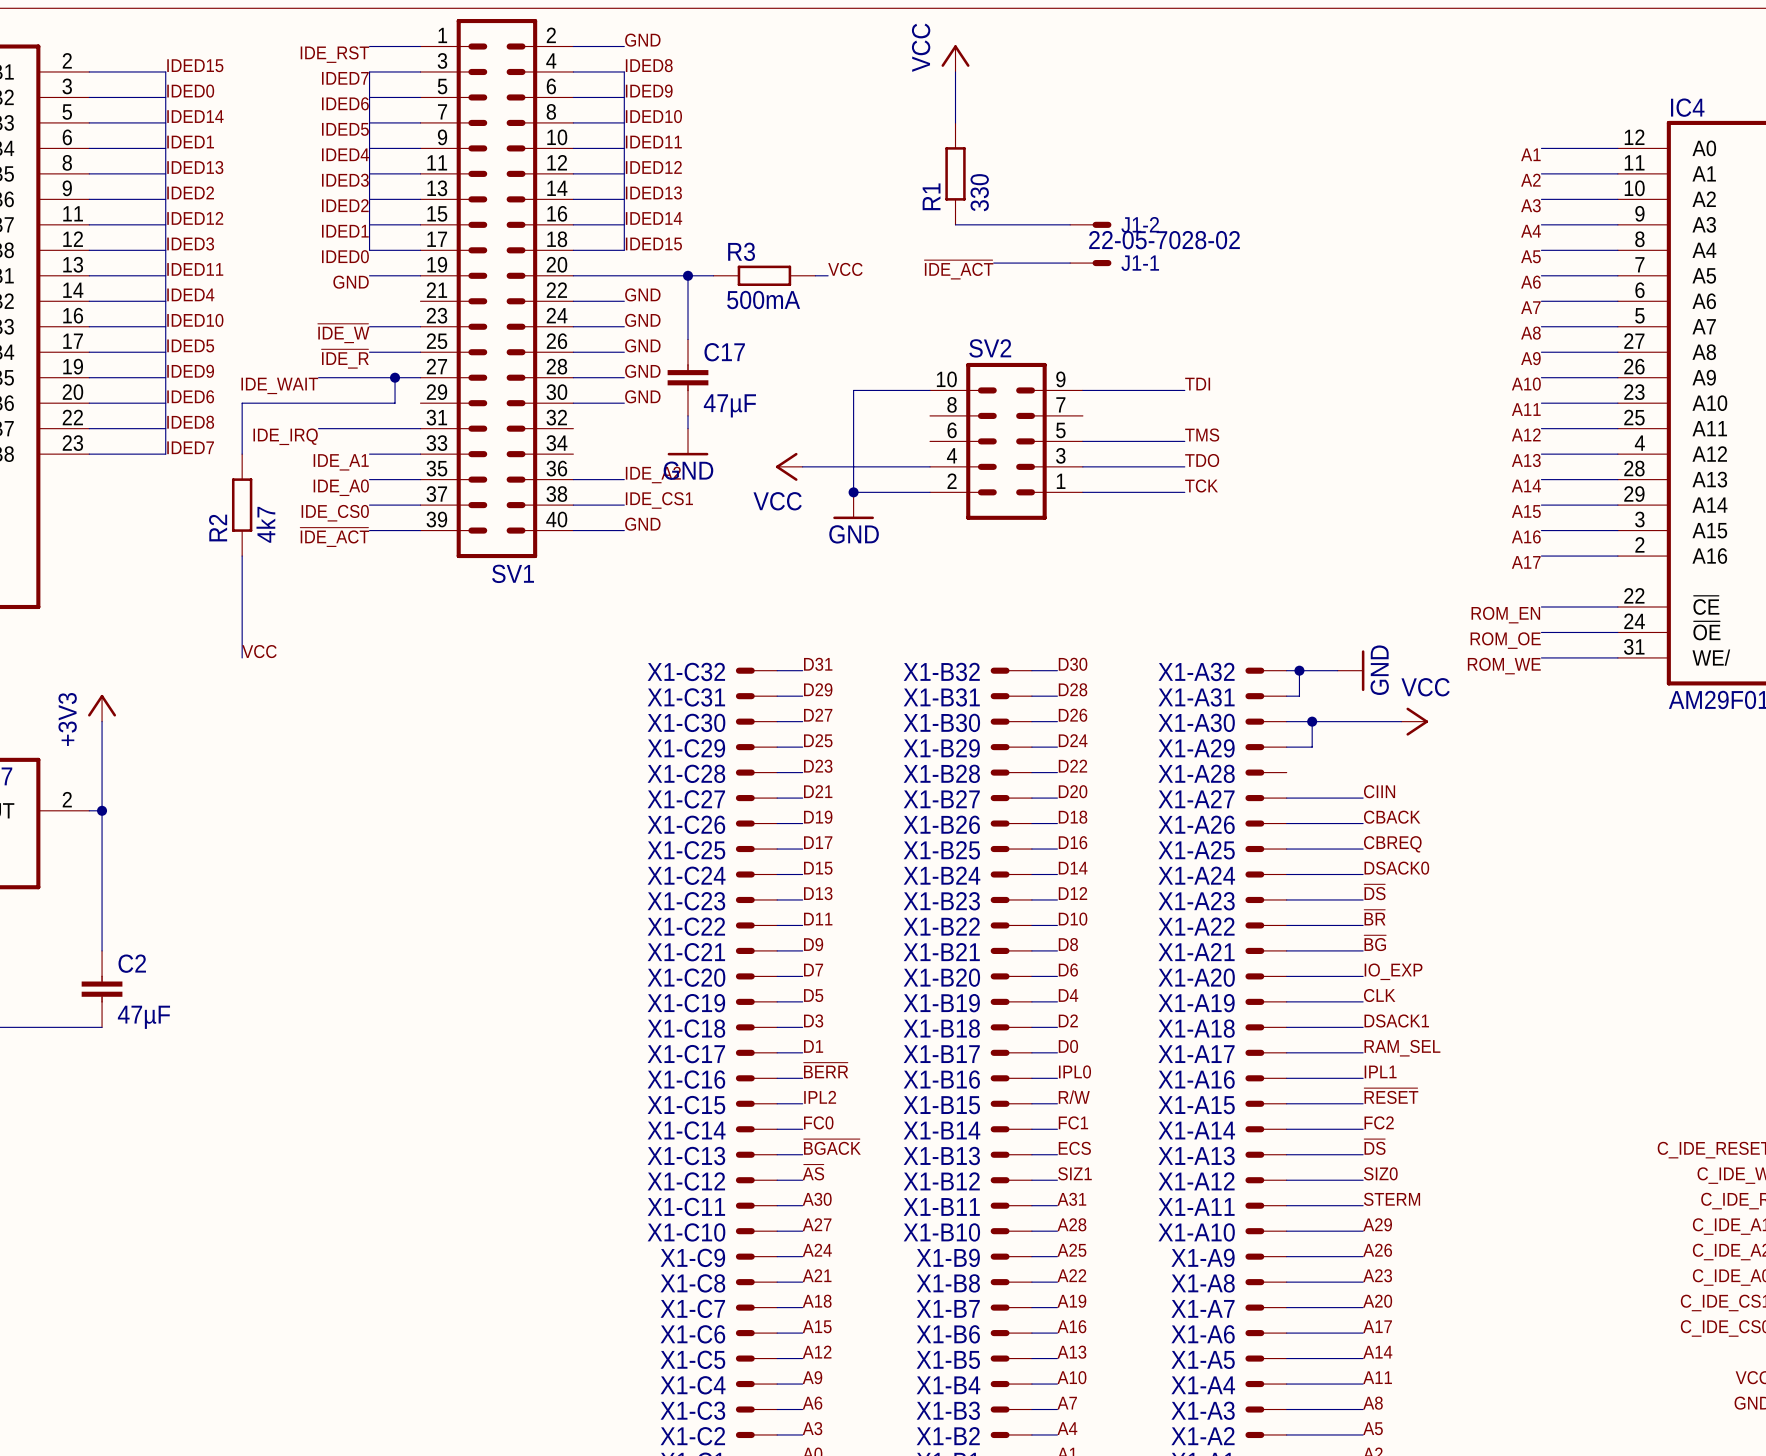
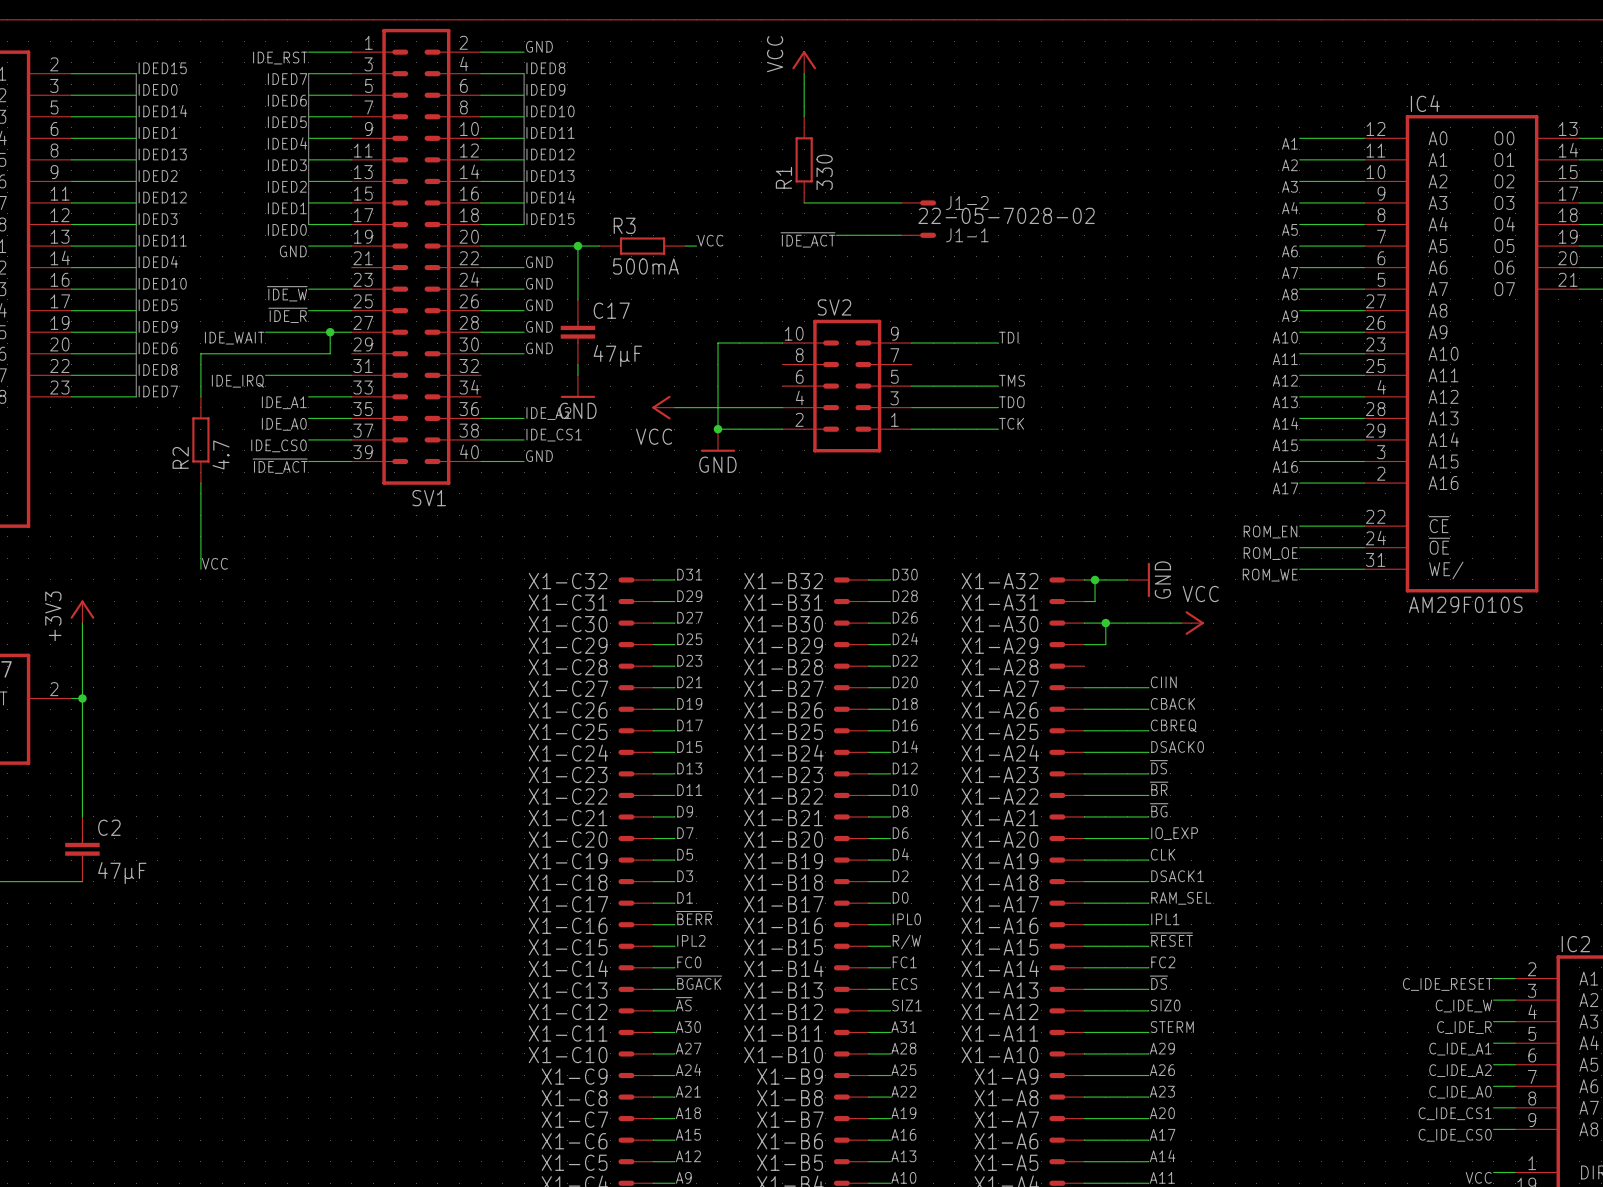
R2 value: 4k7 (265, 524) -> 4.7 (221, 454)

